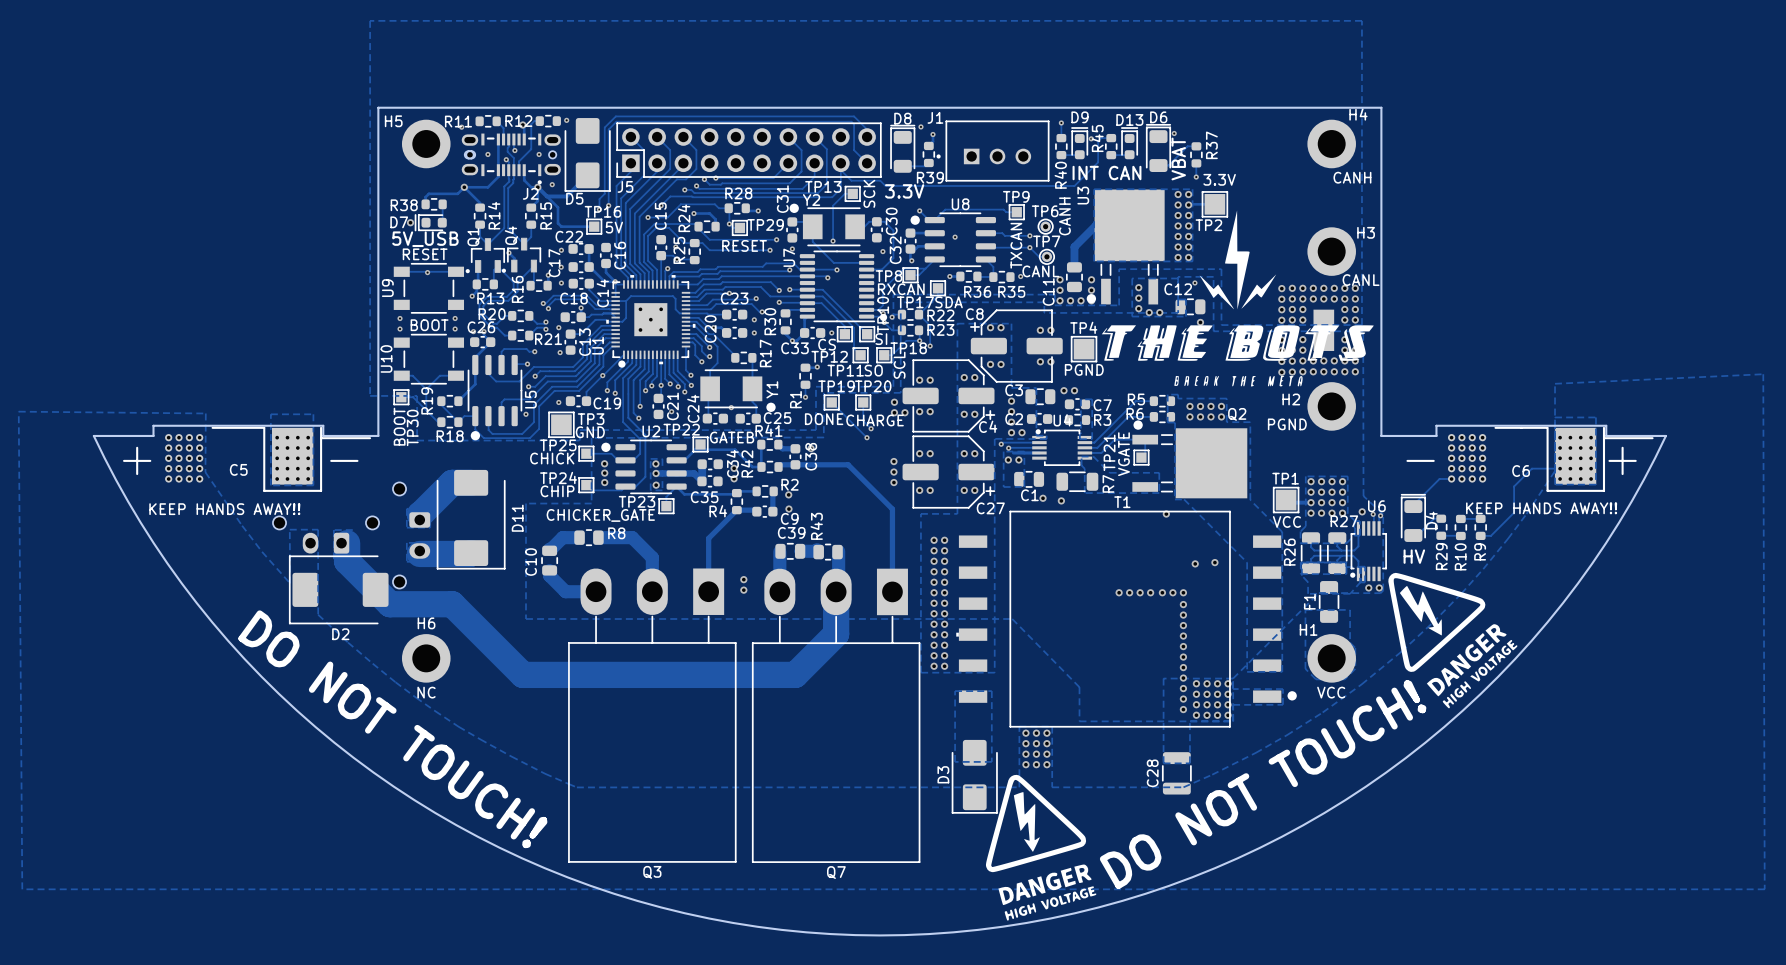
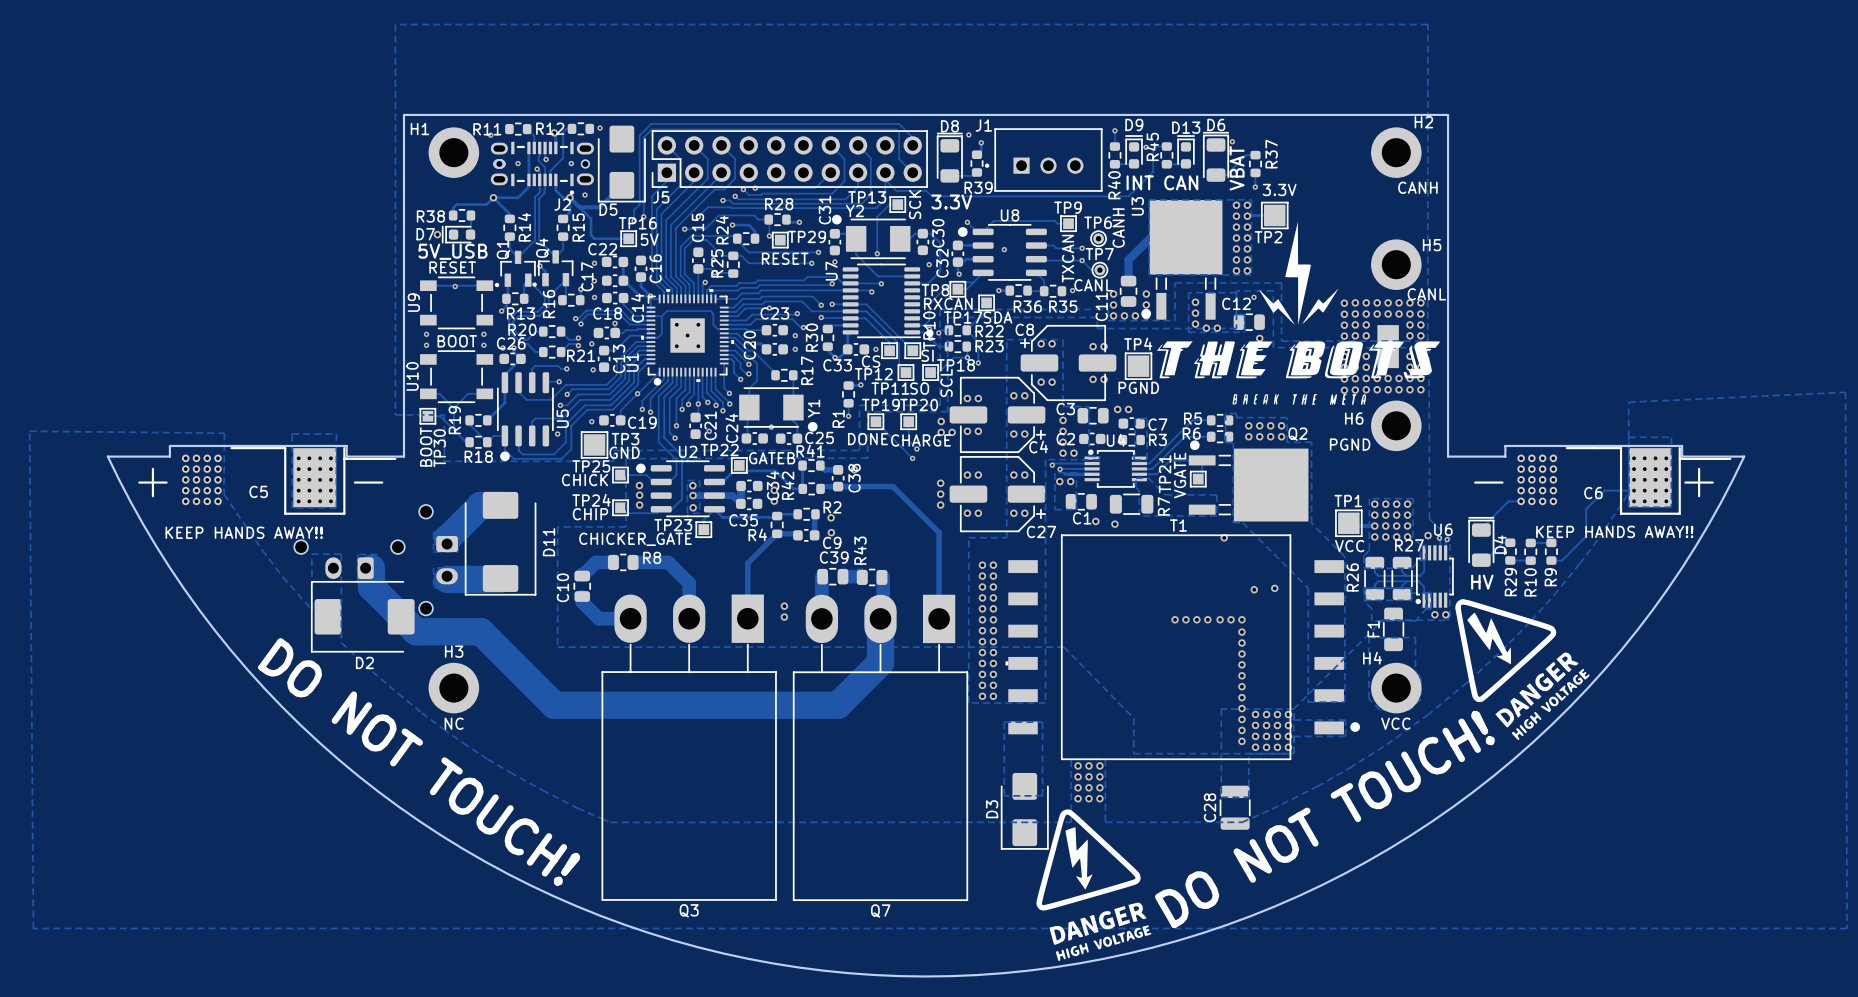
H4 name: H4 (1358, 114) -> H2 (1423, 122)
H5 name: H5 (393, 121) -> H1 (419, 129)
H3 name: H3 (1366, 232) -> H5 (1432, 245)
H2 name: H2 (1291, 399) -> H6 (1354, 418)
H6 name: H6 (426, 623) -> H3 (454, 651)
H1 name: H1 (1308, 629) -> H4 (1372, 658)

